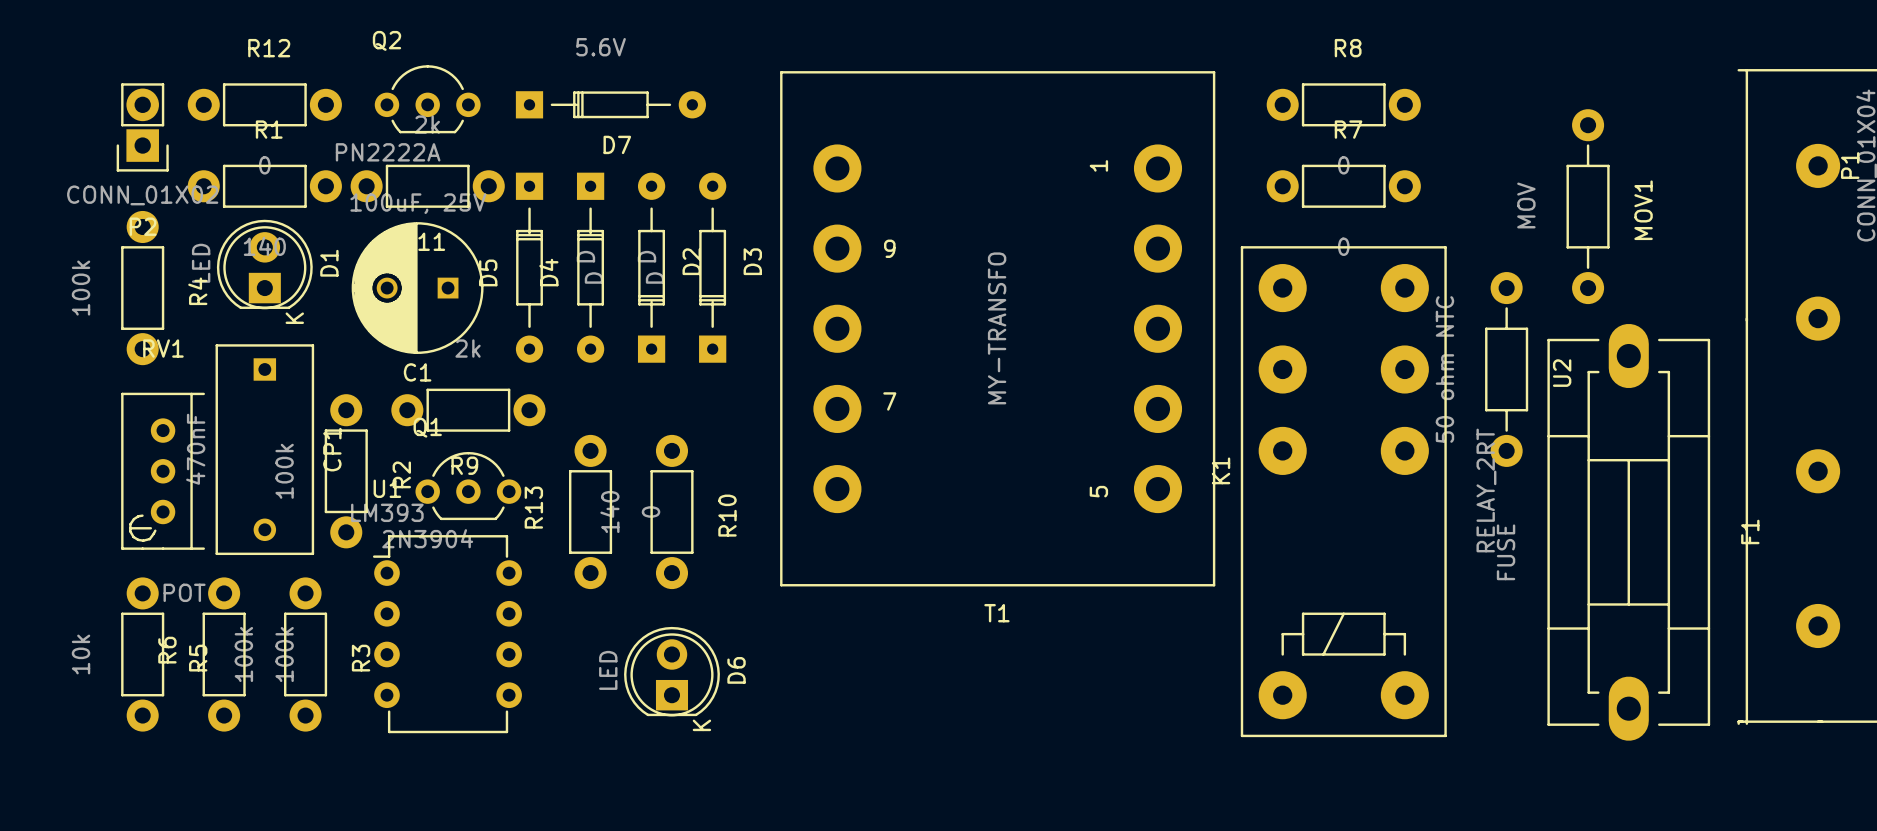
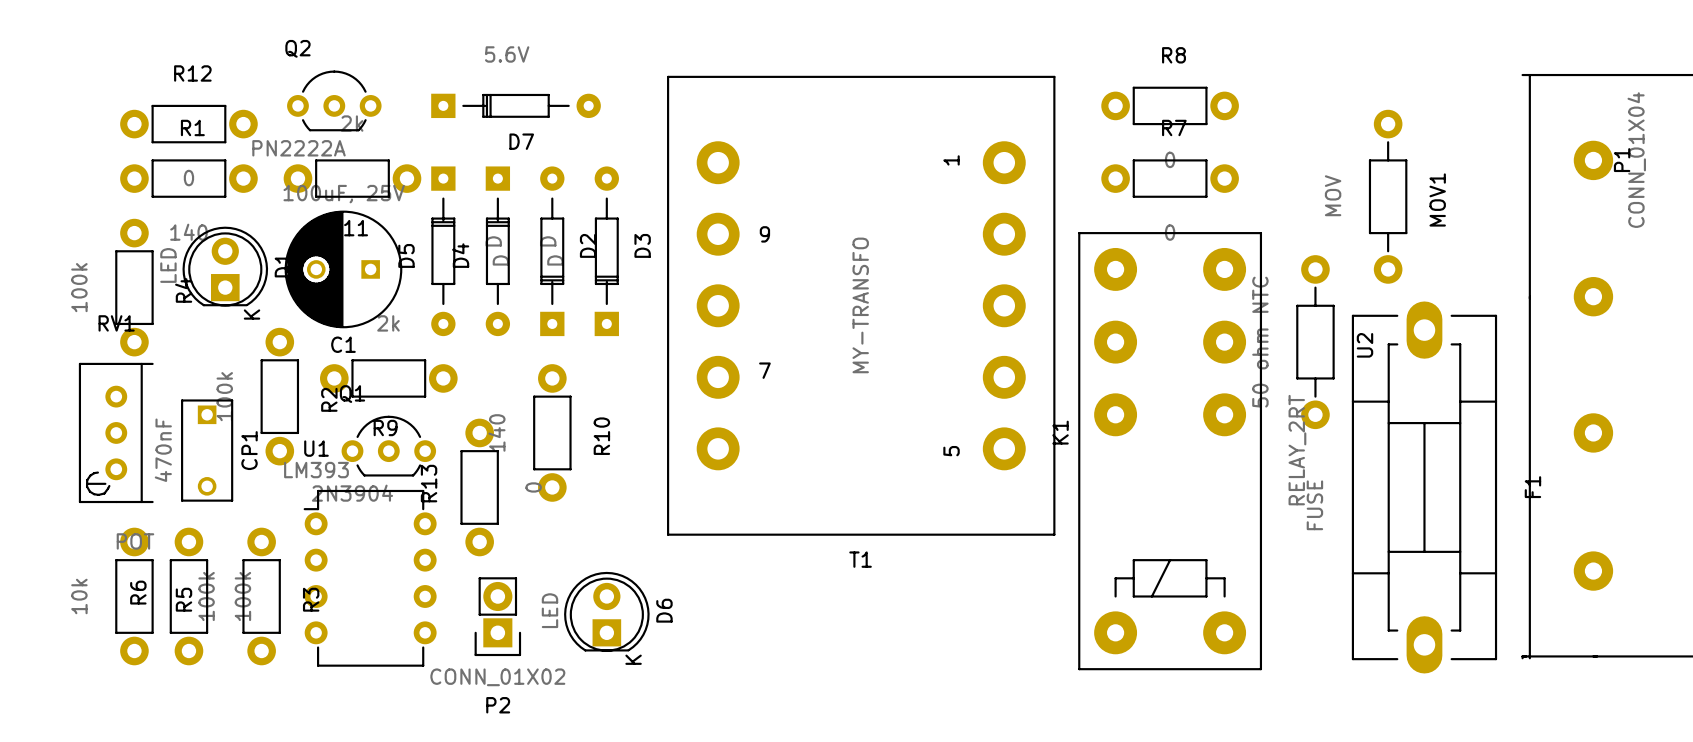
Q2 position: (427, 99) -> (334, 100)
R12 position: (264, 104) -> (188, 124)
P2 position: (142, 127) -> (497, 616)
R1 position: (264, 186) -> (188, 178)
D1 position: (264, 264) -> (225, 266)
R4 position: (142, 288) -> (134, 287)
CP1 footprint: [215, 344, 315, 556] -> [181, 399, 234, 502]
R2 position: (346, 471) -> (279, 396)
R13 position: (590, 511) -> (479, 487)
R10 position: (671, 511) -> (552, 432)
R5 position: (142, 654) -> (134, 596)
R6 position: (224, 654) -> (188, 596)
R3 position: (305, 654) -> (261, 596)
D6 position: (671, 671) -> (606, 611)

